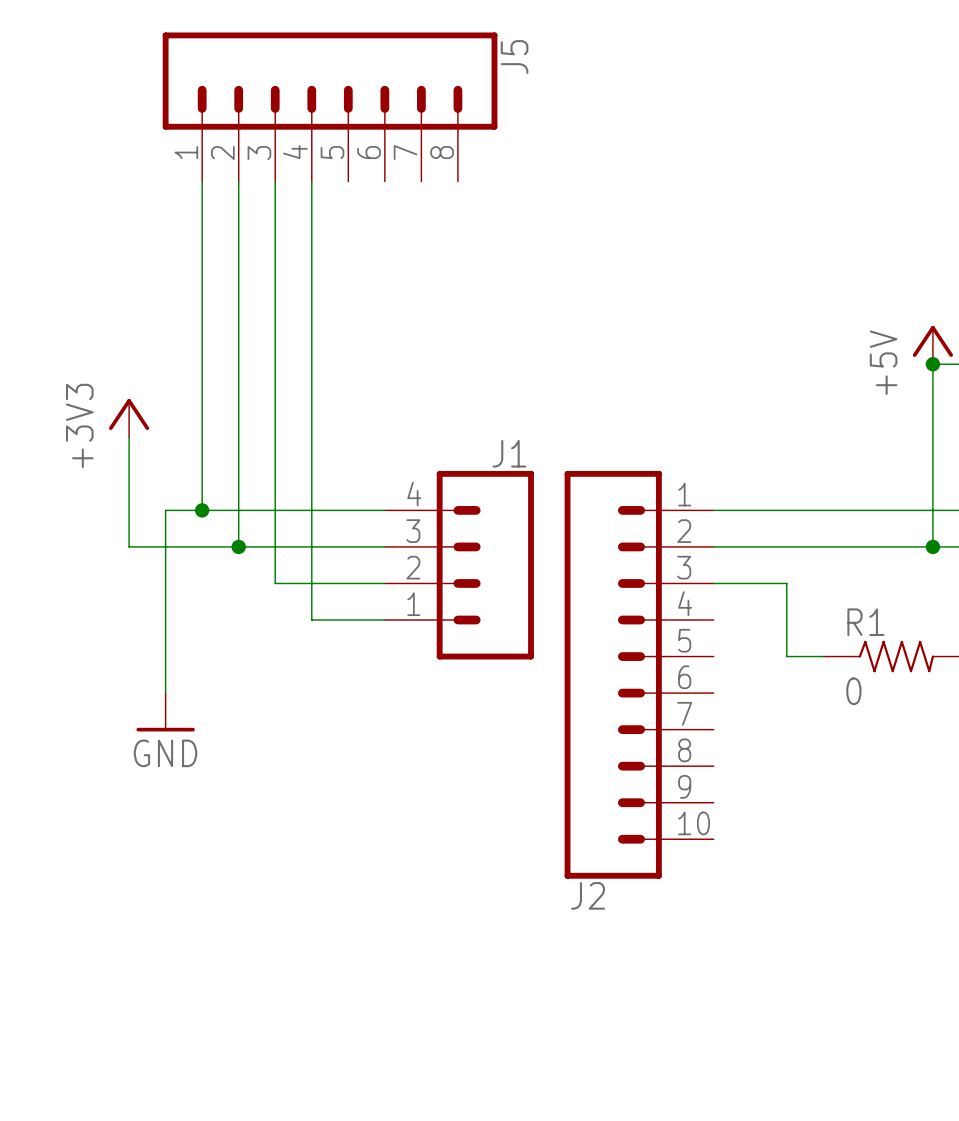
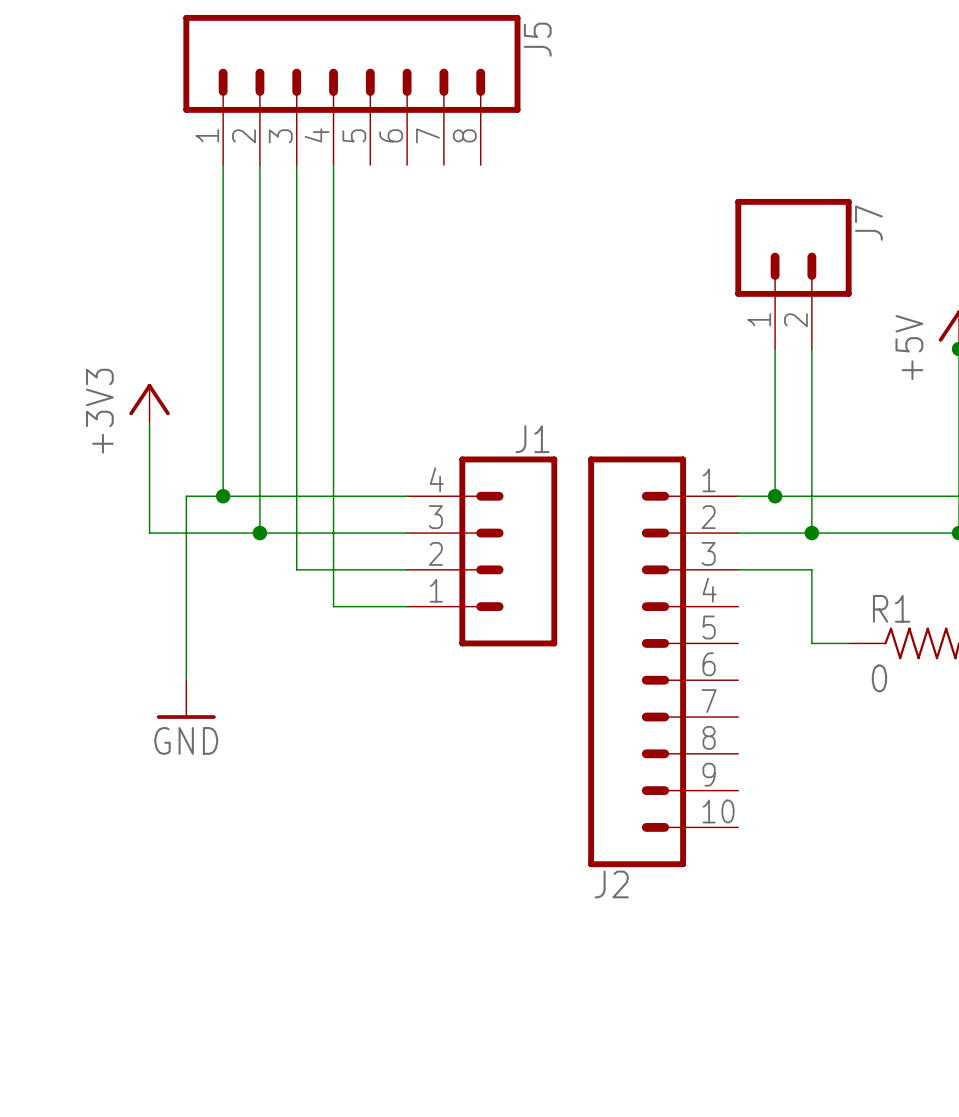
J7: none -> (793, 274)
wire: none -> (775, 349) (775, 496)
wire: none -> (811, 349) (811, 533)
junction: none -> (775, 496)
junction: none -> (811, 533)

